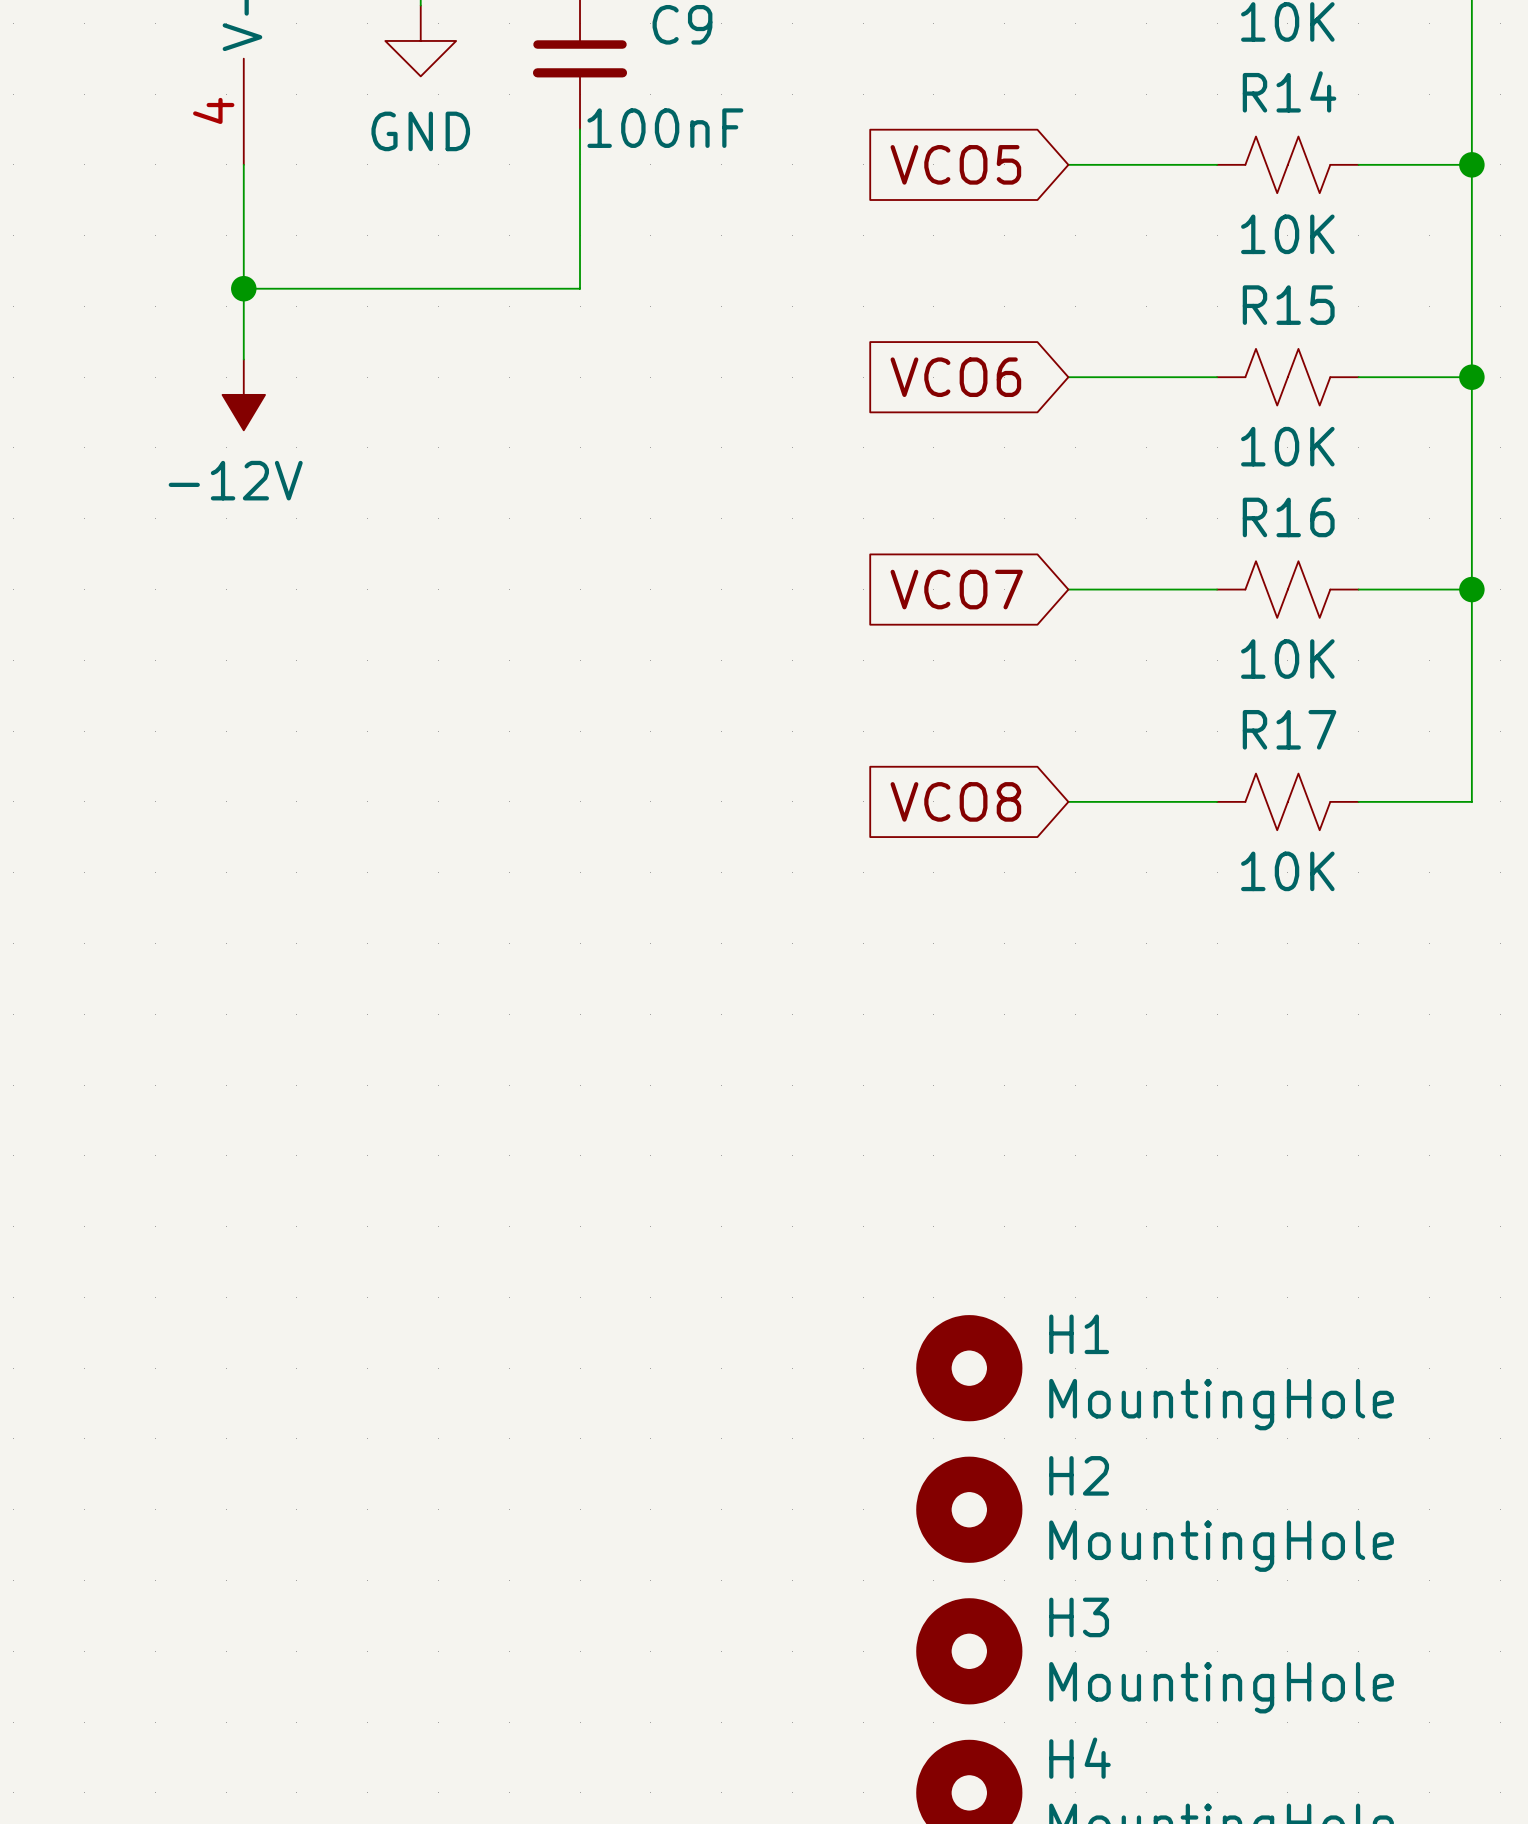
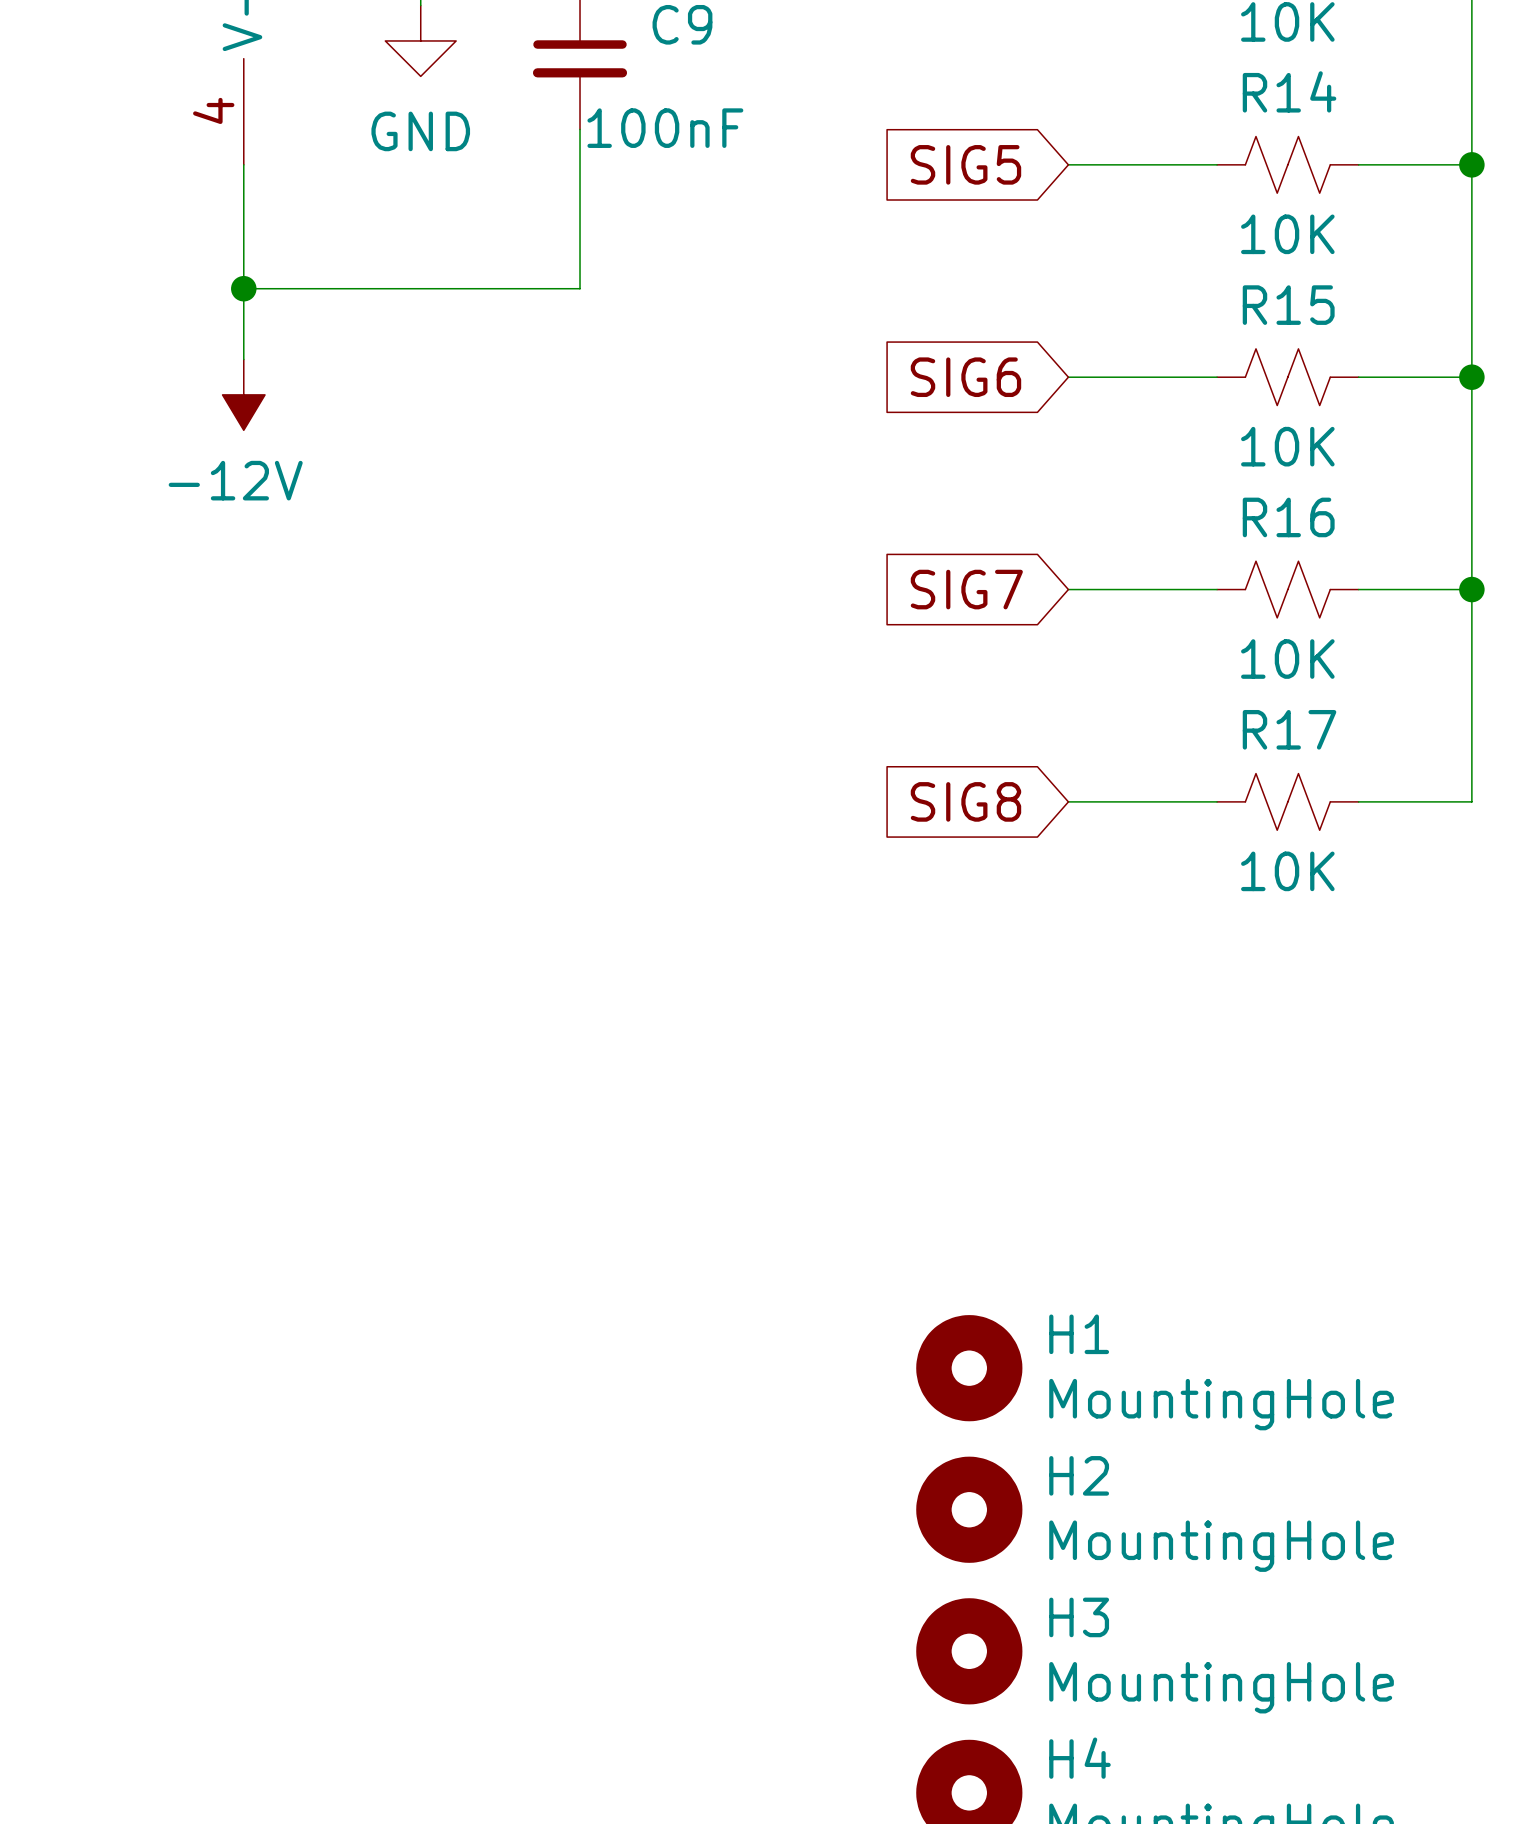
global label: VCO5 (955, 164) -> SIG5 (965, 164)
global label: VCO6 (955, 377) -> SIG6 (965, 377)
global label: VCO7 (956, 589) -> SIG7 (966, 589)
global label: VCO8 (955, 801) -> SIG8 (965, 801)

